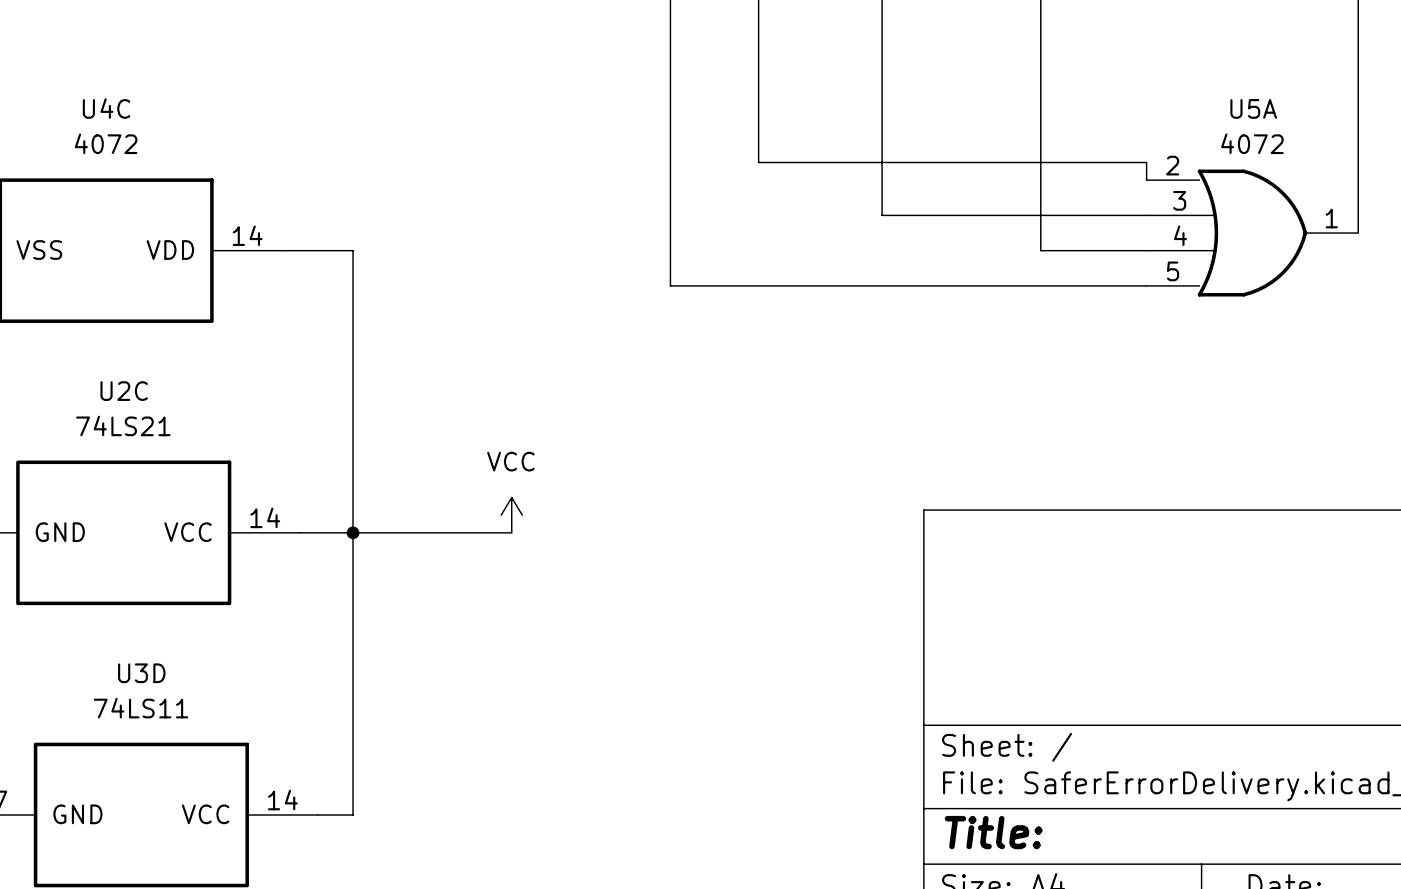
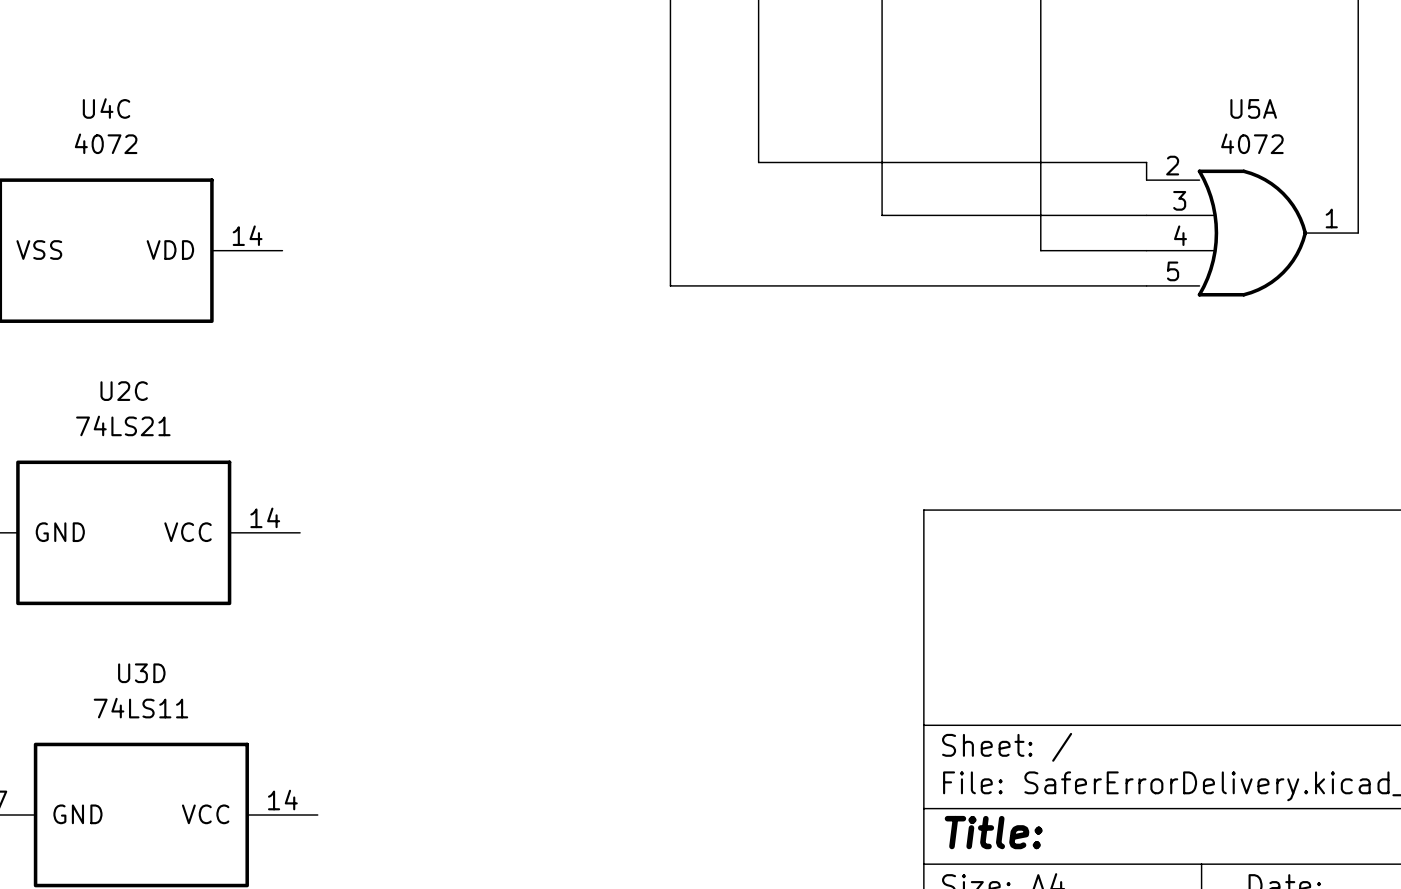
wire: (282, 250) (353, 250) (353, 815) (317, 815) -> none
power symbol: VCC (511, 515) -> none
wire: (300, 532) (511, 532) -> none
junction: (353, 532) -> none

